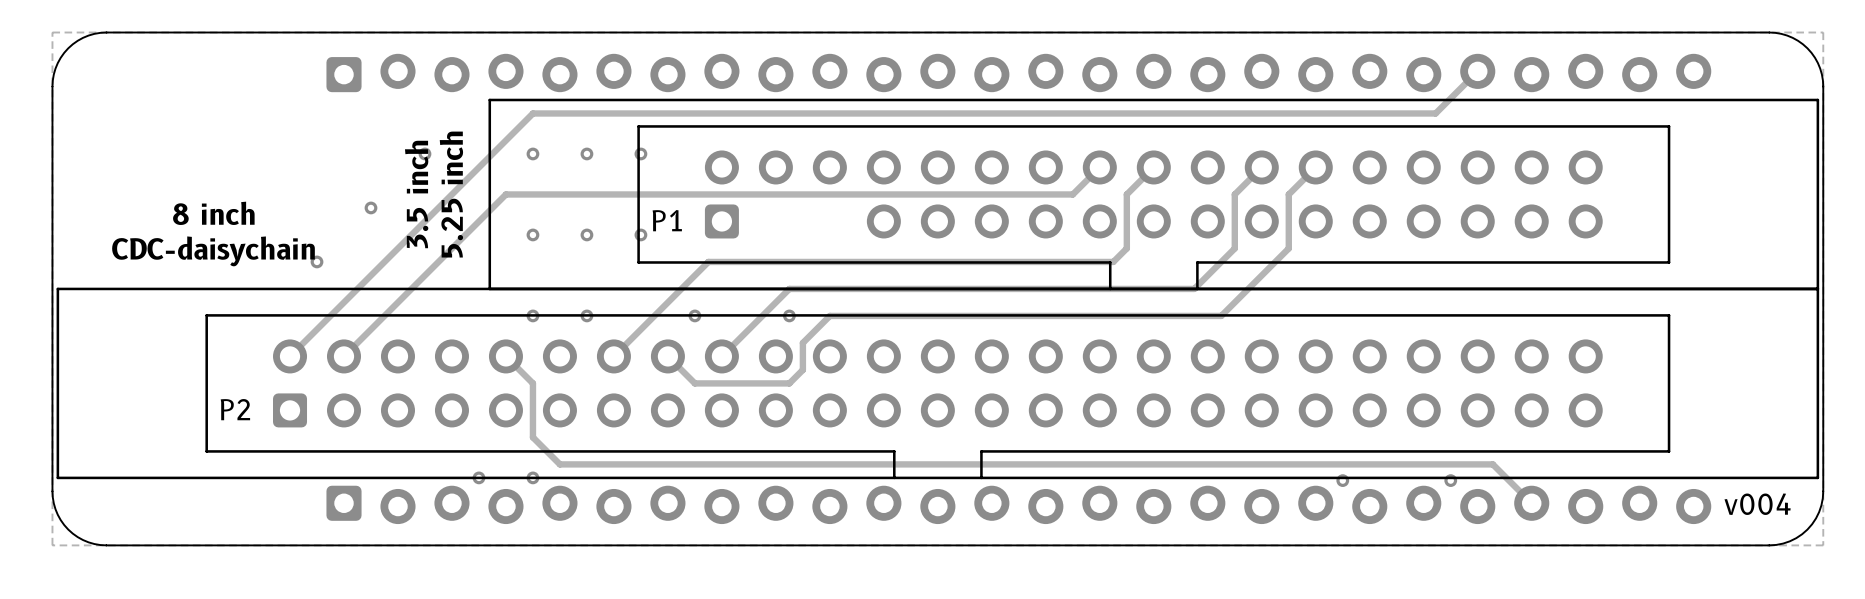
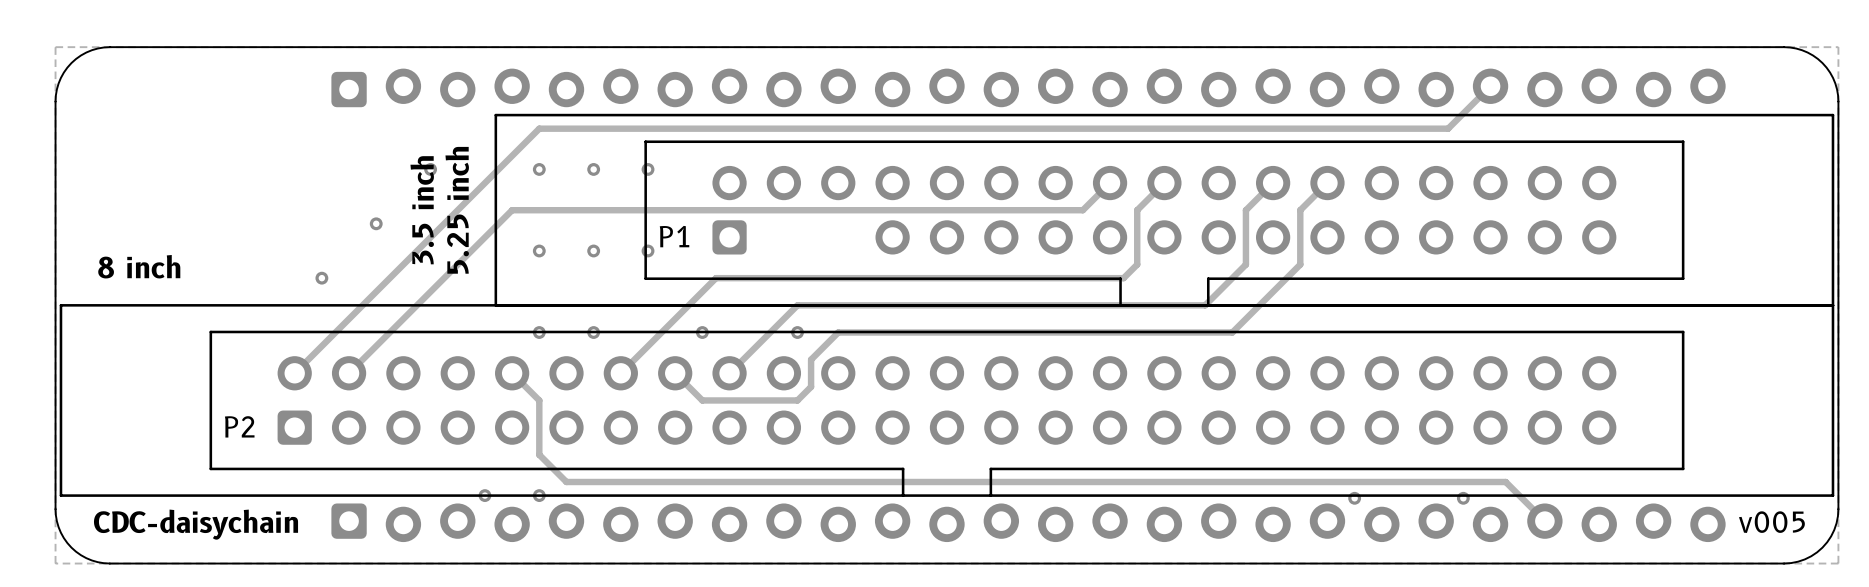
text position: 8 inch (213, 213) -> 8 inch (139, 266)
text position: CDC-daisychain (213, 251) -> CDC-daisychain (196, 524)
text: v004 (1757, 504) -> v005 (1771, 522)

